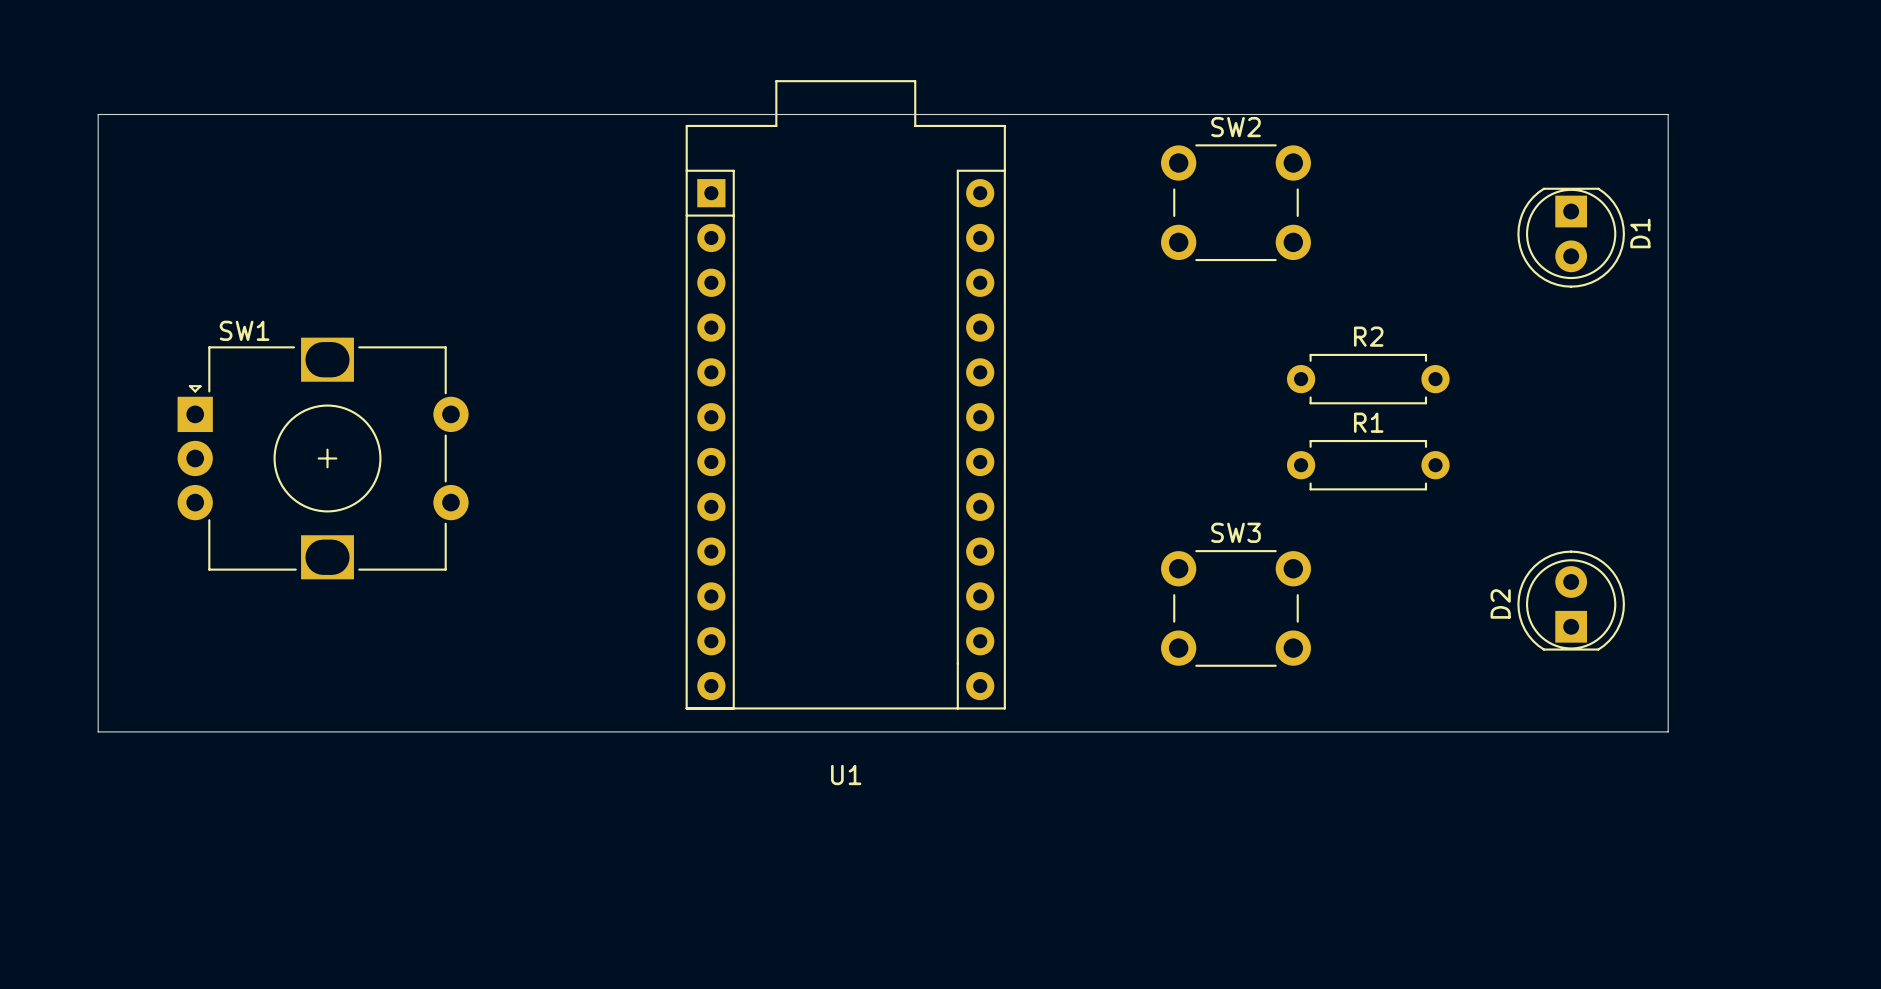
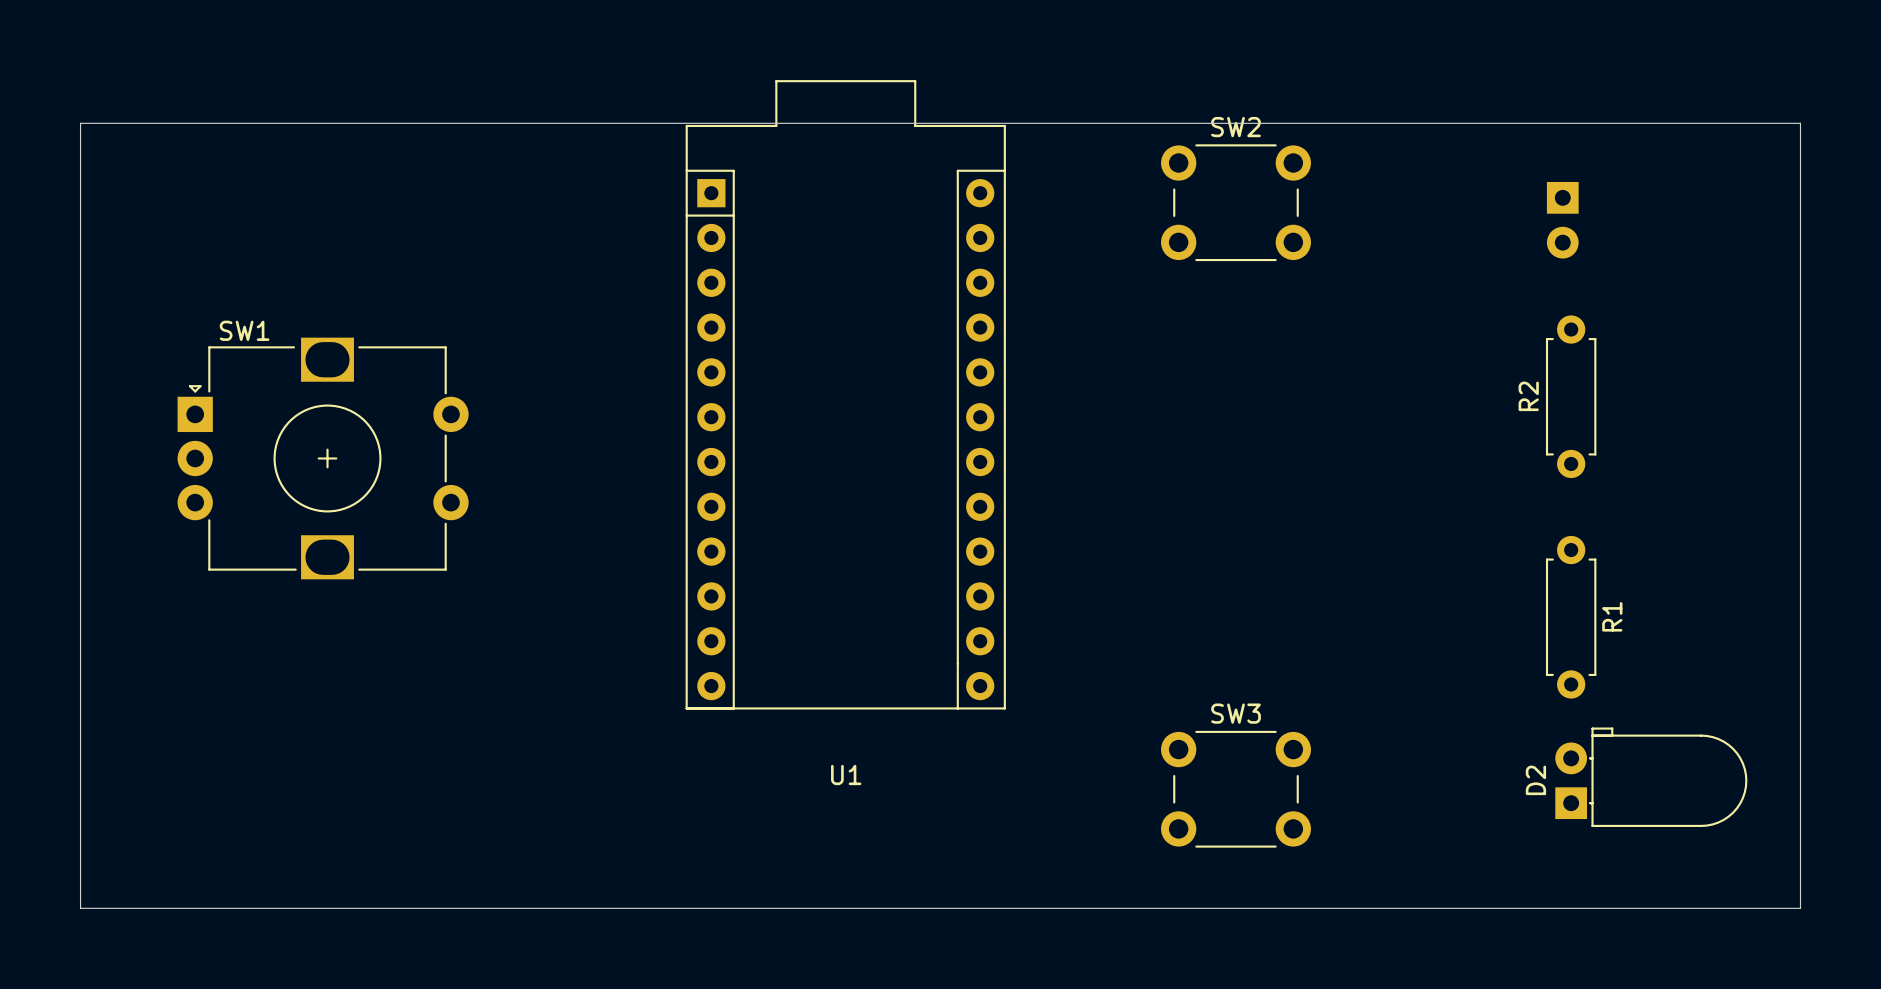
board edge: (98, 114) (1668, 114) (1668, 731) (98, 731) (98, 114) -> (80, 123) (80, 908) (1800, 908) (1800, 123) (80, 123)
D1 side: top (1571, 237) -> bottom (1562, 220)
R2 name position: R2 (1368, 336) -> R2 (1528, 396)
R2 rotation: 0° (1368, 379) -> 90° clockwise (1571, 396)
R2 position: (1368, 379) -> (1571, 396)
R1 rotation: 0° (1368, 465) -> 90° clockwise (1571, 617)
R1 position: (1368, 465) -> (1571, 617)
D2 footprint: [1517, 550, 1625, 651] -> [1555, 727, 1748, 828]
D2 name position: D2 (1500, 603) -> D2 (1535, 780)
SW3 position: (1235, 608) -> (1235, 789)

